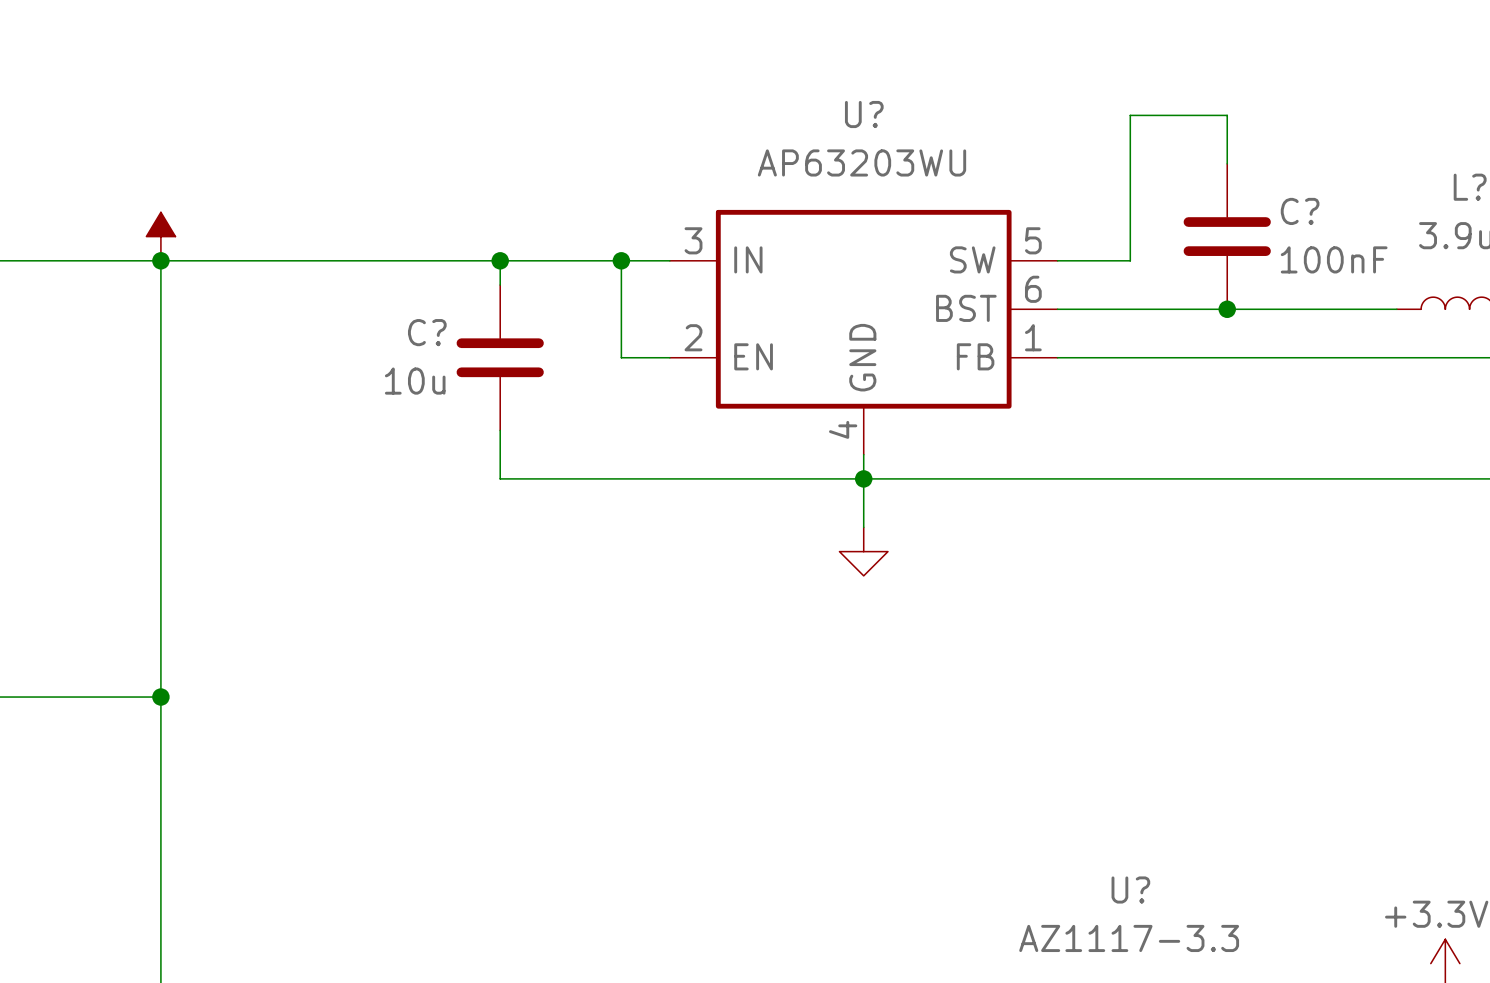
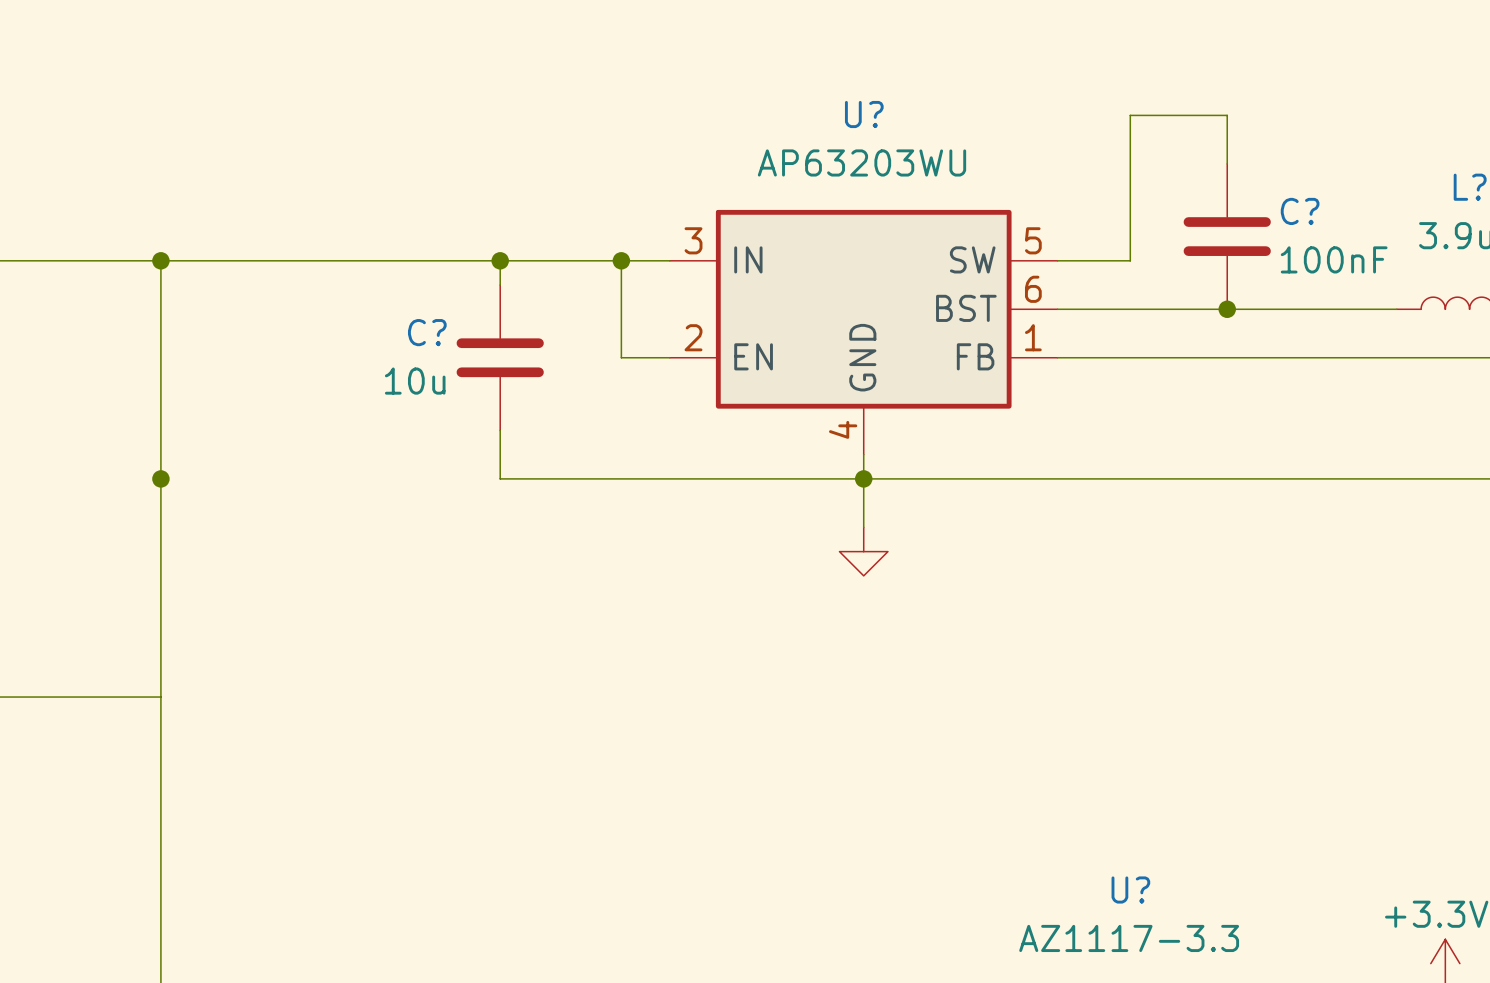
power symbol: (160, 236) -> none
junction: none -> (160, 478)
junction: (160, 697) -> none

